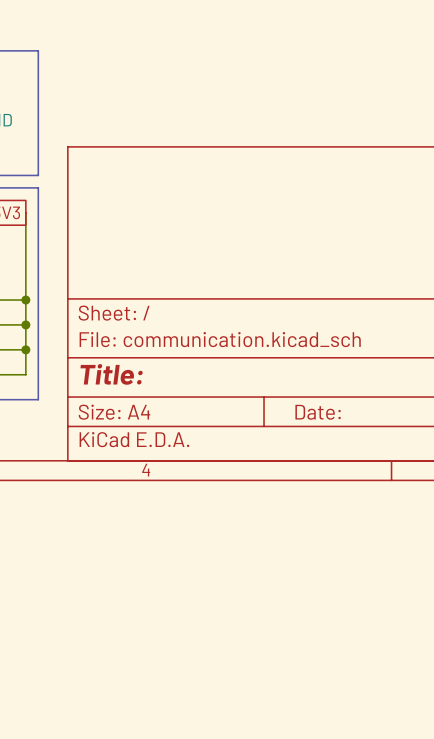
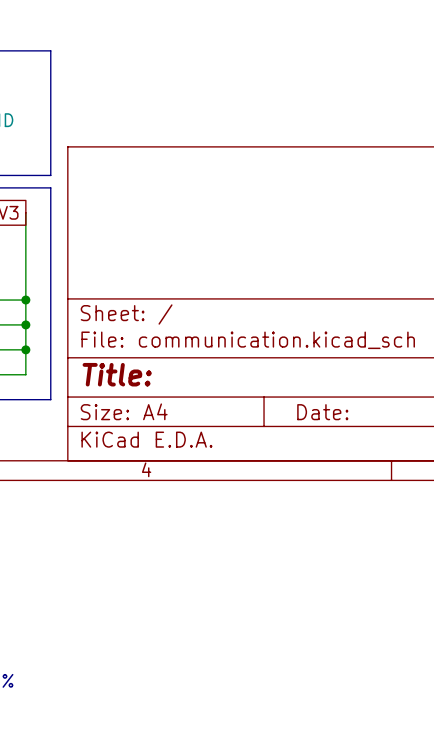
line: (38, 50) (38, 175) -> (38, 50) (50, 50) (50, 175) (38, 175)
line: (38, 187) (38, 399) -> (38, 187) (50, 187) (50, 399) (38, 399)

